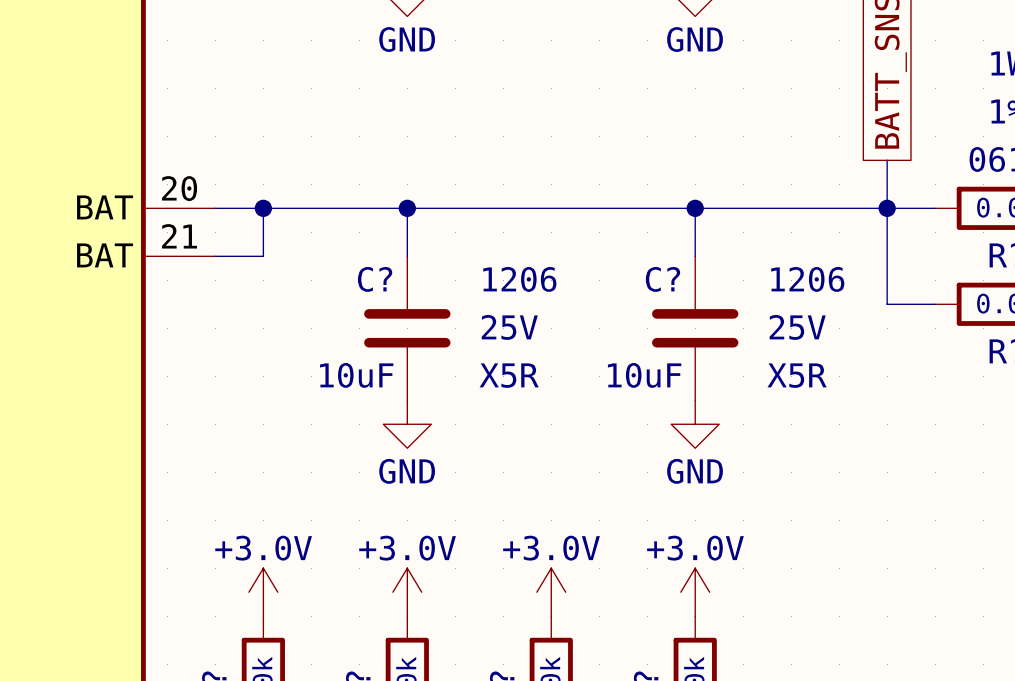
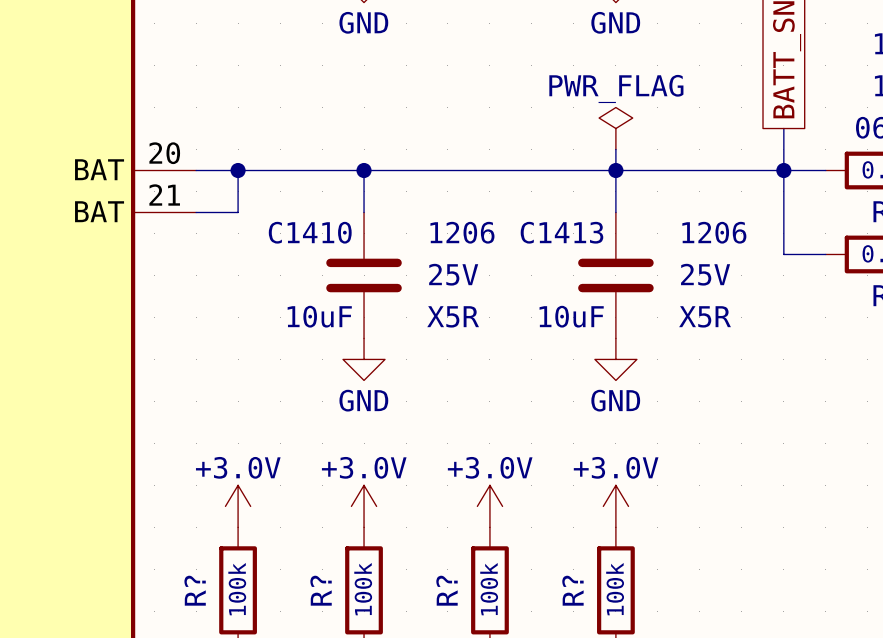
power symbol: none -> PWR_FLAG (615, 128)
wire: none -> (615, 149) (615, 170)
C? name: C? (375, 279) -> C1410 (310, 232)
C? name: C? (662, 279) -> C1413 (561, 232)

